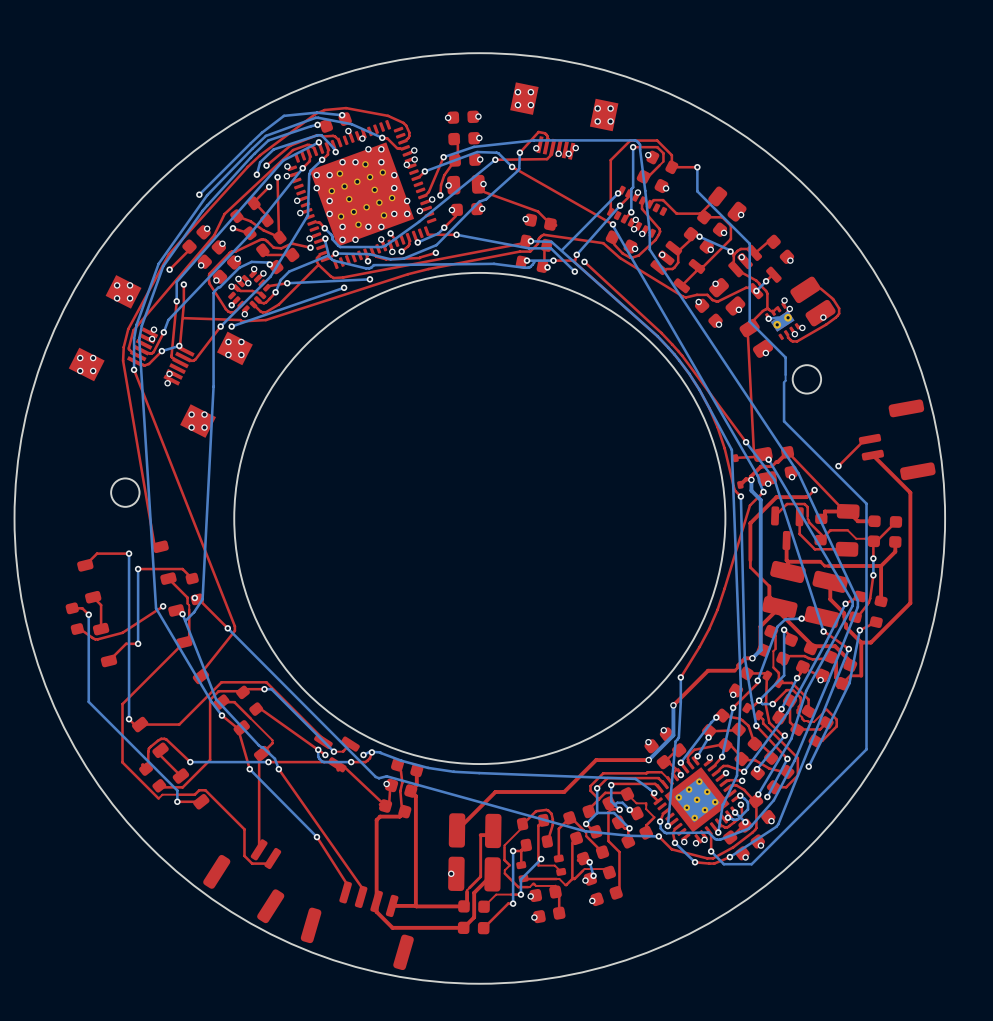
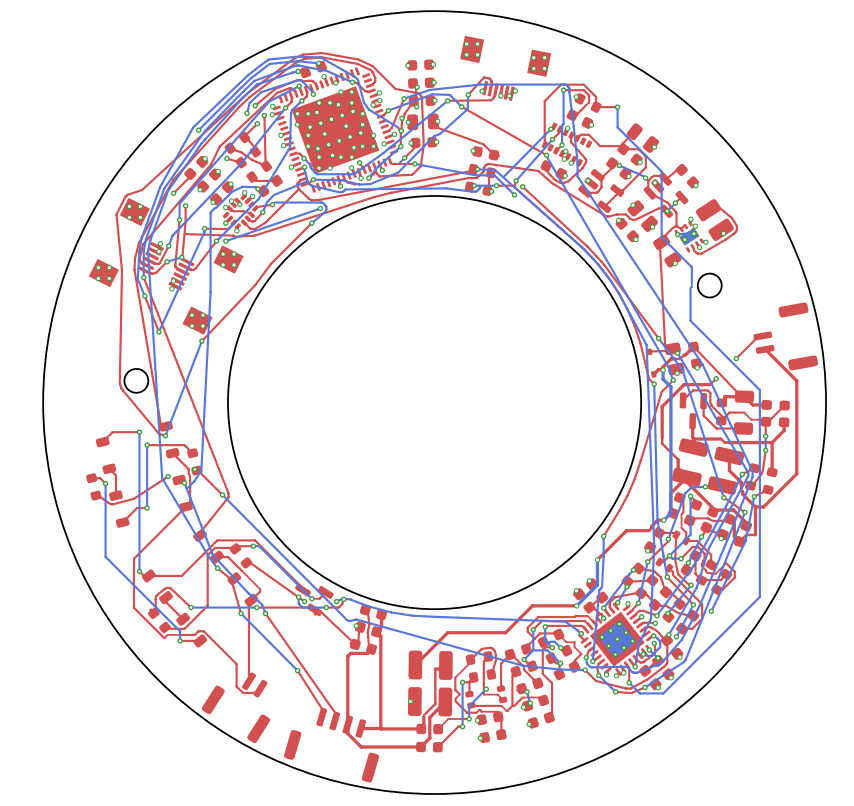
via: none -> (417, 87)
via: none -> (416, 106)
via: none -> (401, 118)
top track: none -> (398, 127) (400, 133) (400, 146)
bottom track: none -> (398, 127) (368, 109) (363, 102) (357, 79) (355, 76) (320, 57) (295, 56) (268, 59) (248, 74) (193, 127) (160, 187) (141, 238) (139, 251) (137, 279) (144, 296)
bottom track: none -> (400, 146) (378, 166) (368, 178)
via: none -> (400, 146)
bottom track: (438, 233) (417, 242) -> none
top track: none -> (375, 170) (379, 176) (412, 174) (420, 166) (423, 145) (421, 96) (418, 93) (395, 88) (372, 66) (358, 59) (322, 53) (303, 54) (294, 58) (247, 93) (142, 190) (125, 197) (116, 214) (121, 270) (119, 383) (123, 390) (158, 433) (165, 435)
top track: (310, 247) (293, 243) (281, 248) (273, 247) (262, 239) (229, 252) (209, 273) (209, 281) (225, 309) (233, 312) -> (204, 228) (227, 229)
via: (310, 247) -> none
top track: (435, 252) (419, 258) (386, 259) -> none
via: (435, 252) -> none
bottom track: (369, 279) (287, 283) -> none
via: (369, 279) -> none
bottom track: none -> (274, 202) (323, 203) (326, 206) (325, 211) (311, 223)
top track: none -> (311, 223) (270, 263) (255, 285) (201, 341)
via: none -> (311, 223)
bottom track: none -> (204, 228) (158, 331)
via: none -> (204, 228)
top track: none -> (144, 296) (158, 331)
via: none -> (144, 296)
via: none -> (158, 331)
bottom track: none -> (201, 341) (165, 435)
via: none -> (201, 341)
via: none -> (165, 435)

